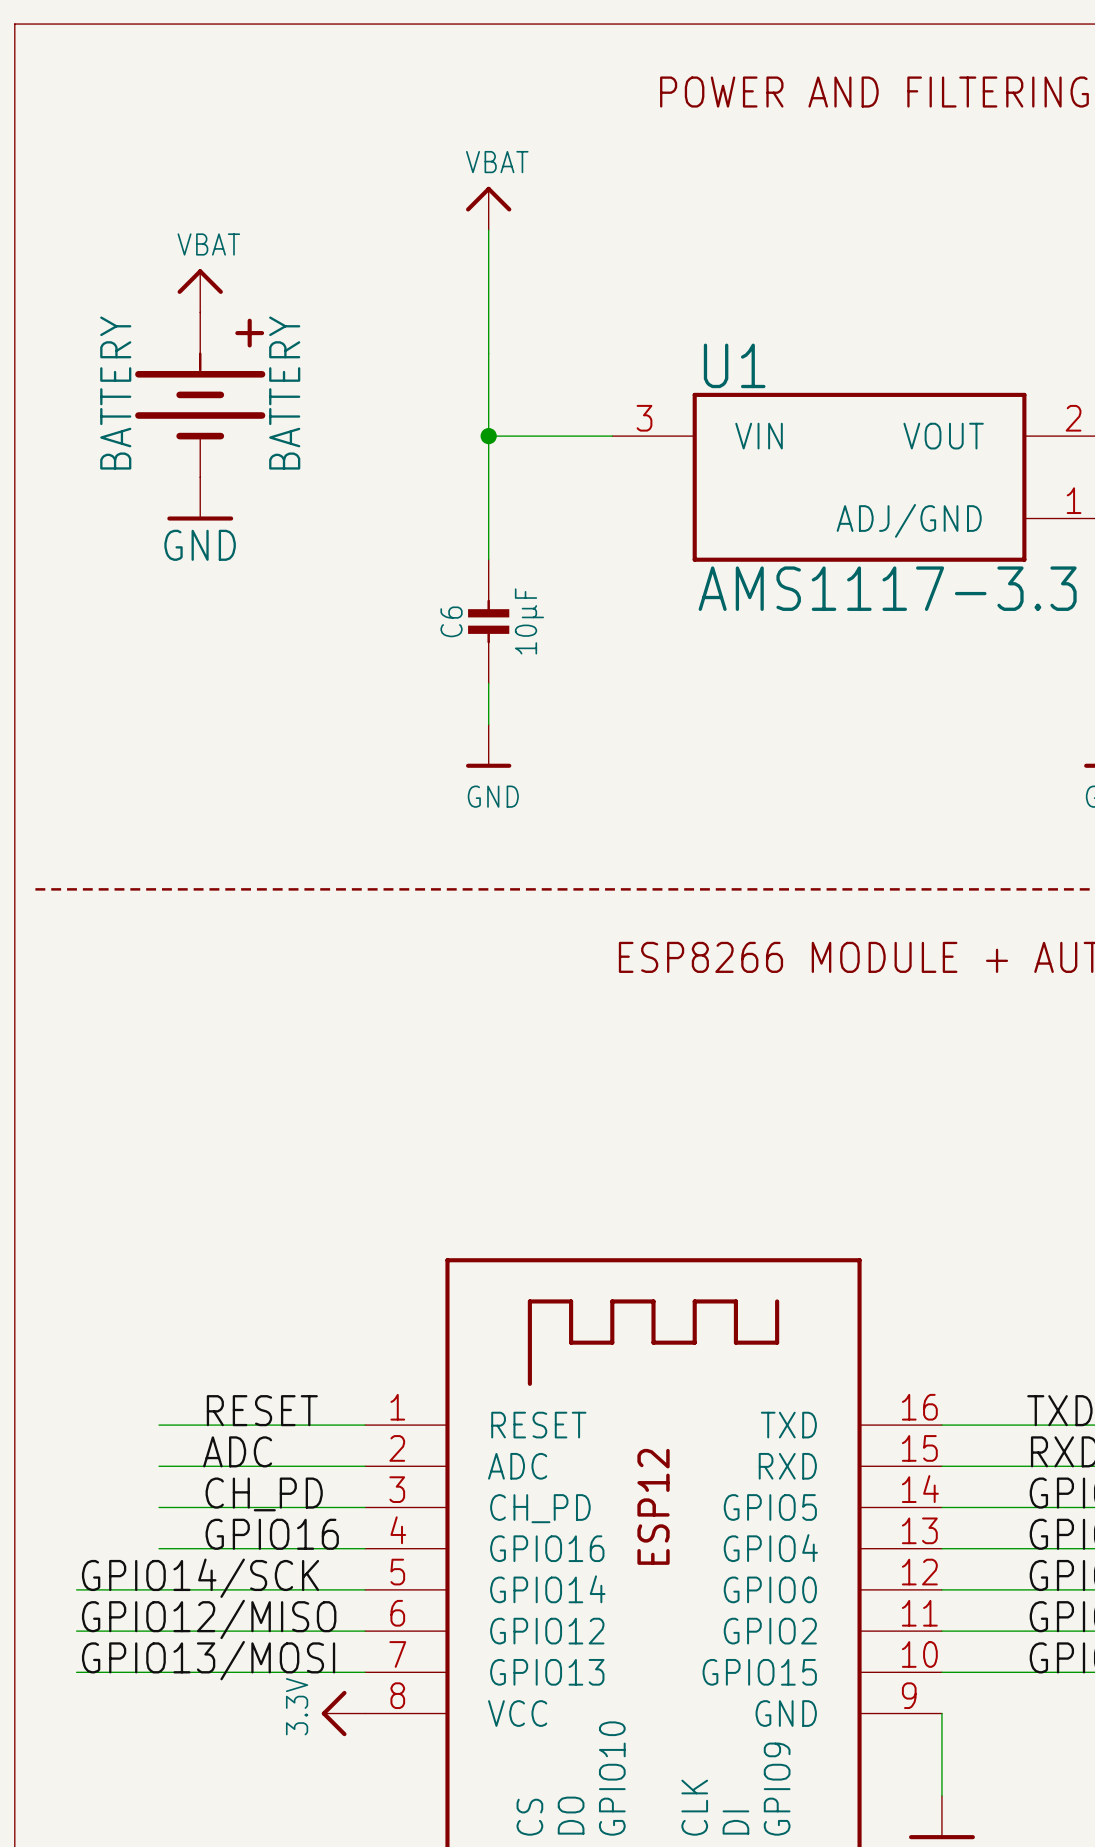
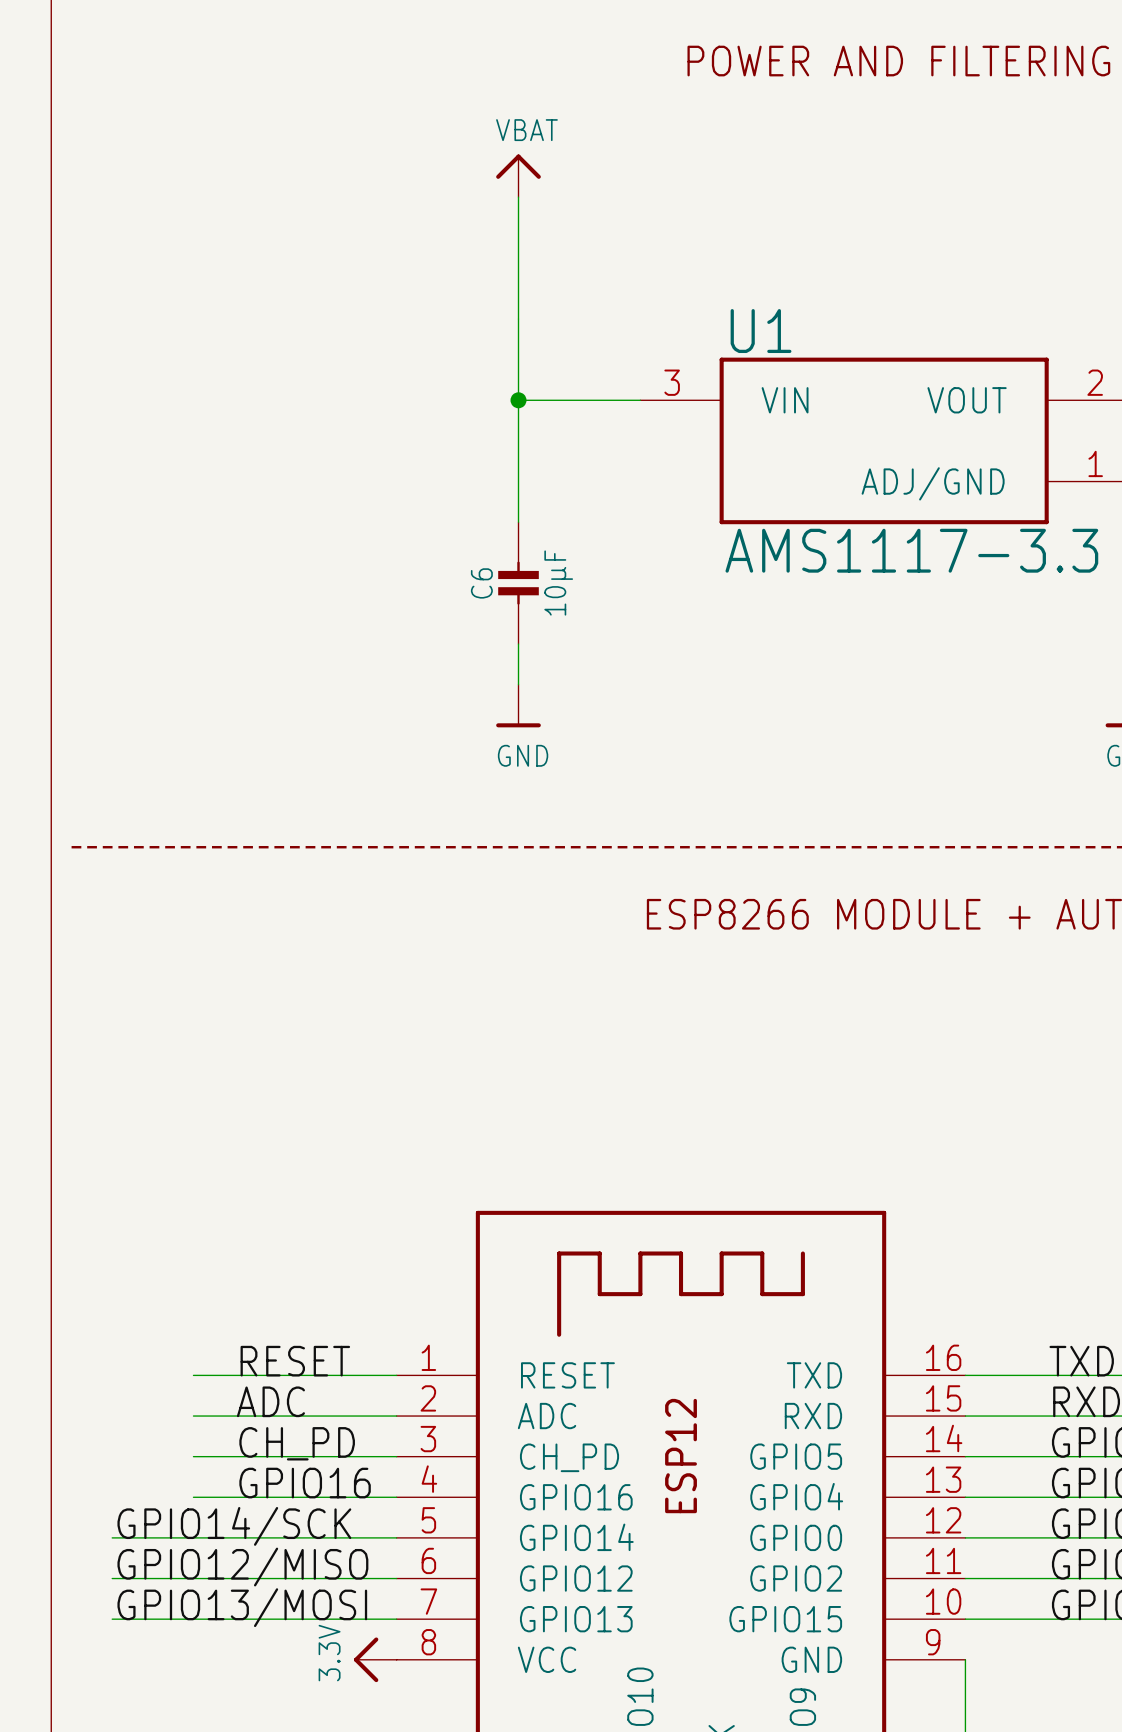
power symbol: VBAT (200, 290) -> none
BATTERY: BATTERY (200, 394) -> none
power symbol: GND (200, 498) -> none

